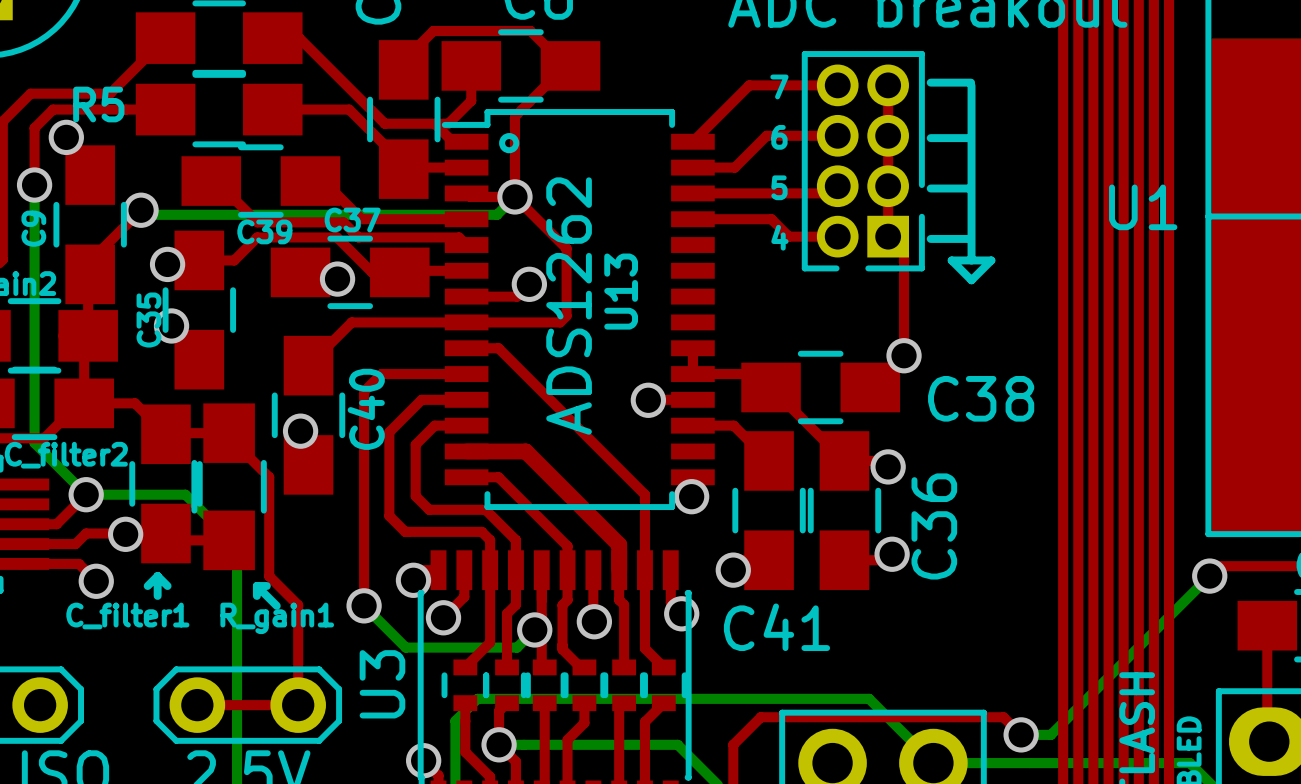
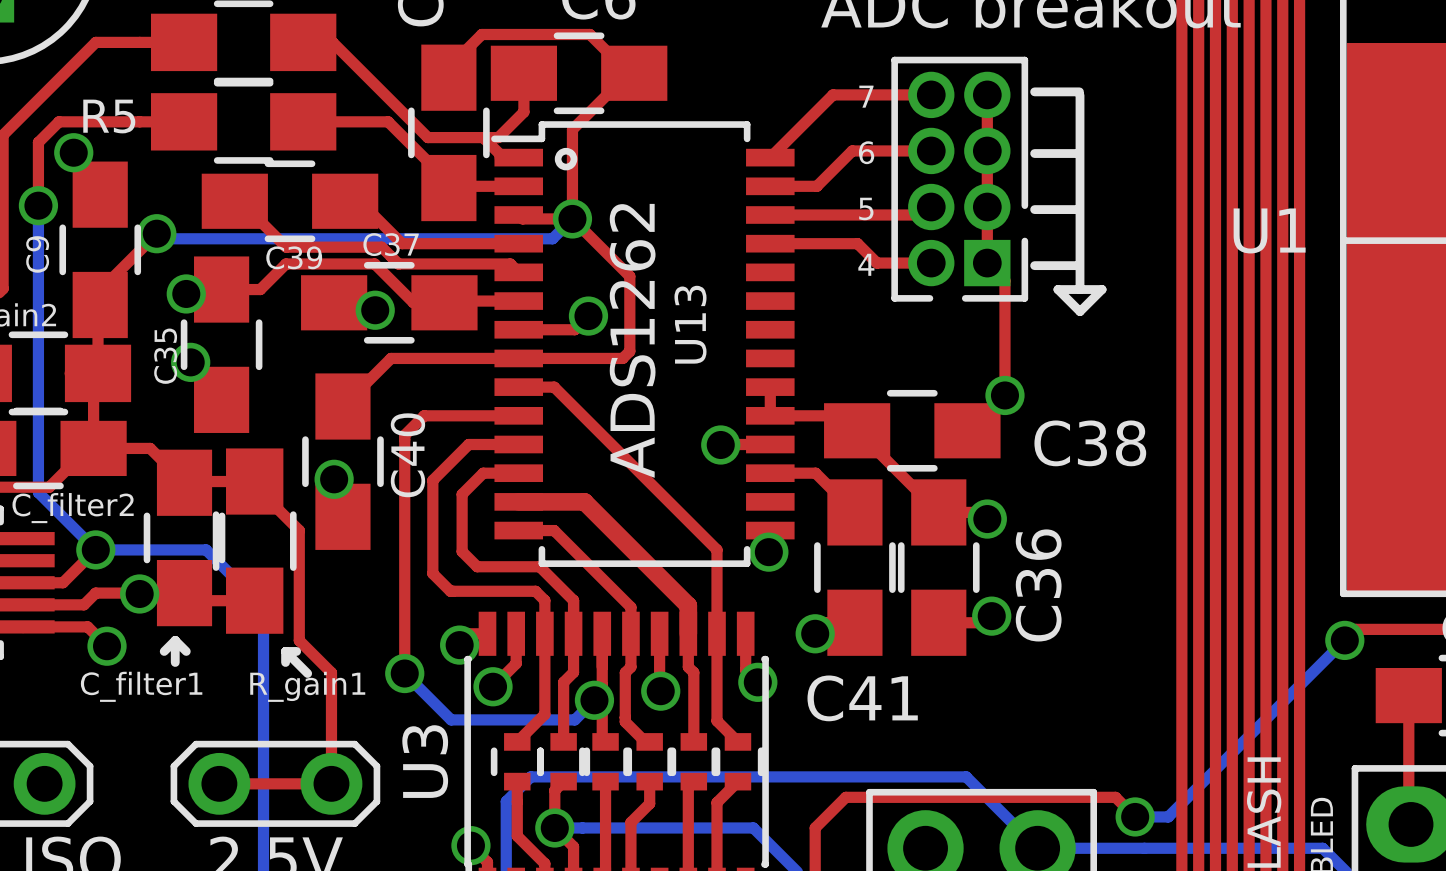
top track: (165, 38) (110, 93) (30, 93) -> (179, 42) (95, 42) (34, 104)

